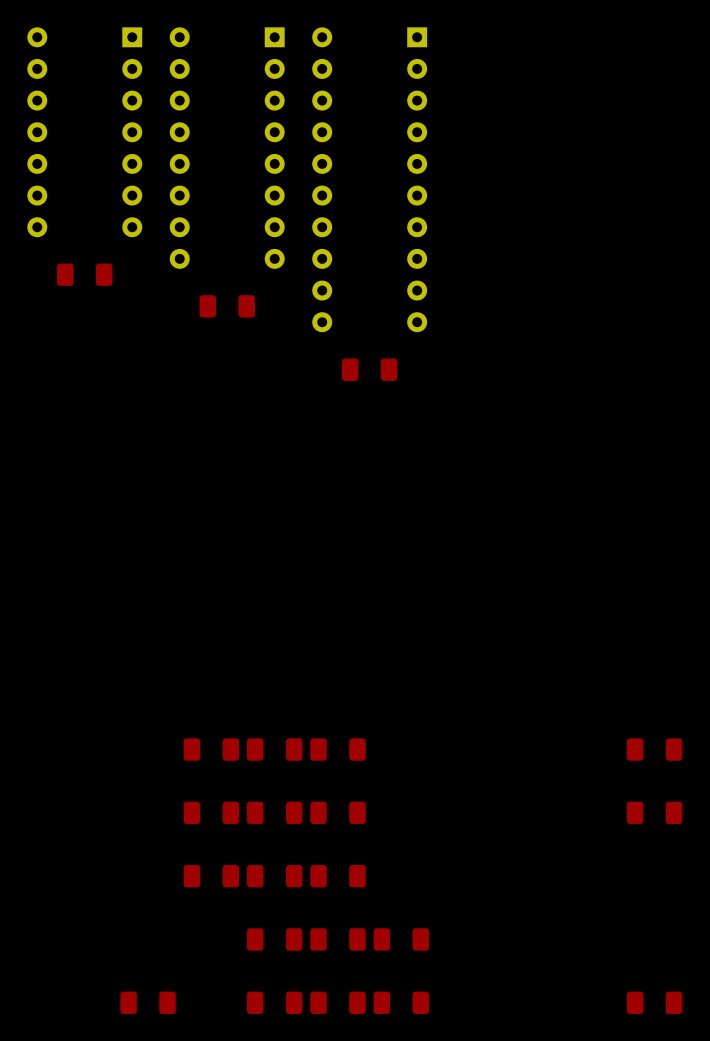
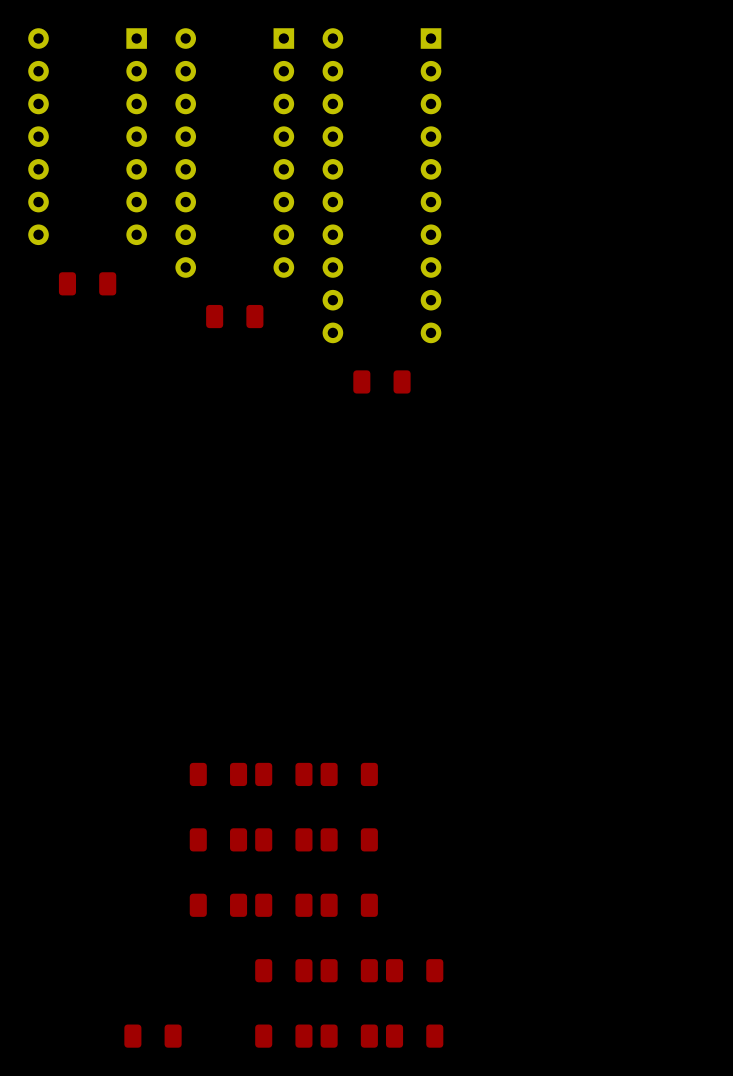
part: (654, 749) -> none
part: (654, 812) -> none
part: (654, 1002) -> none

